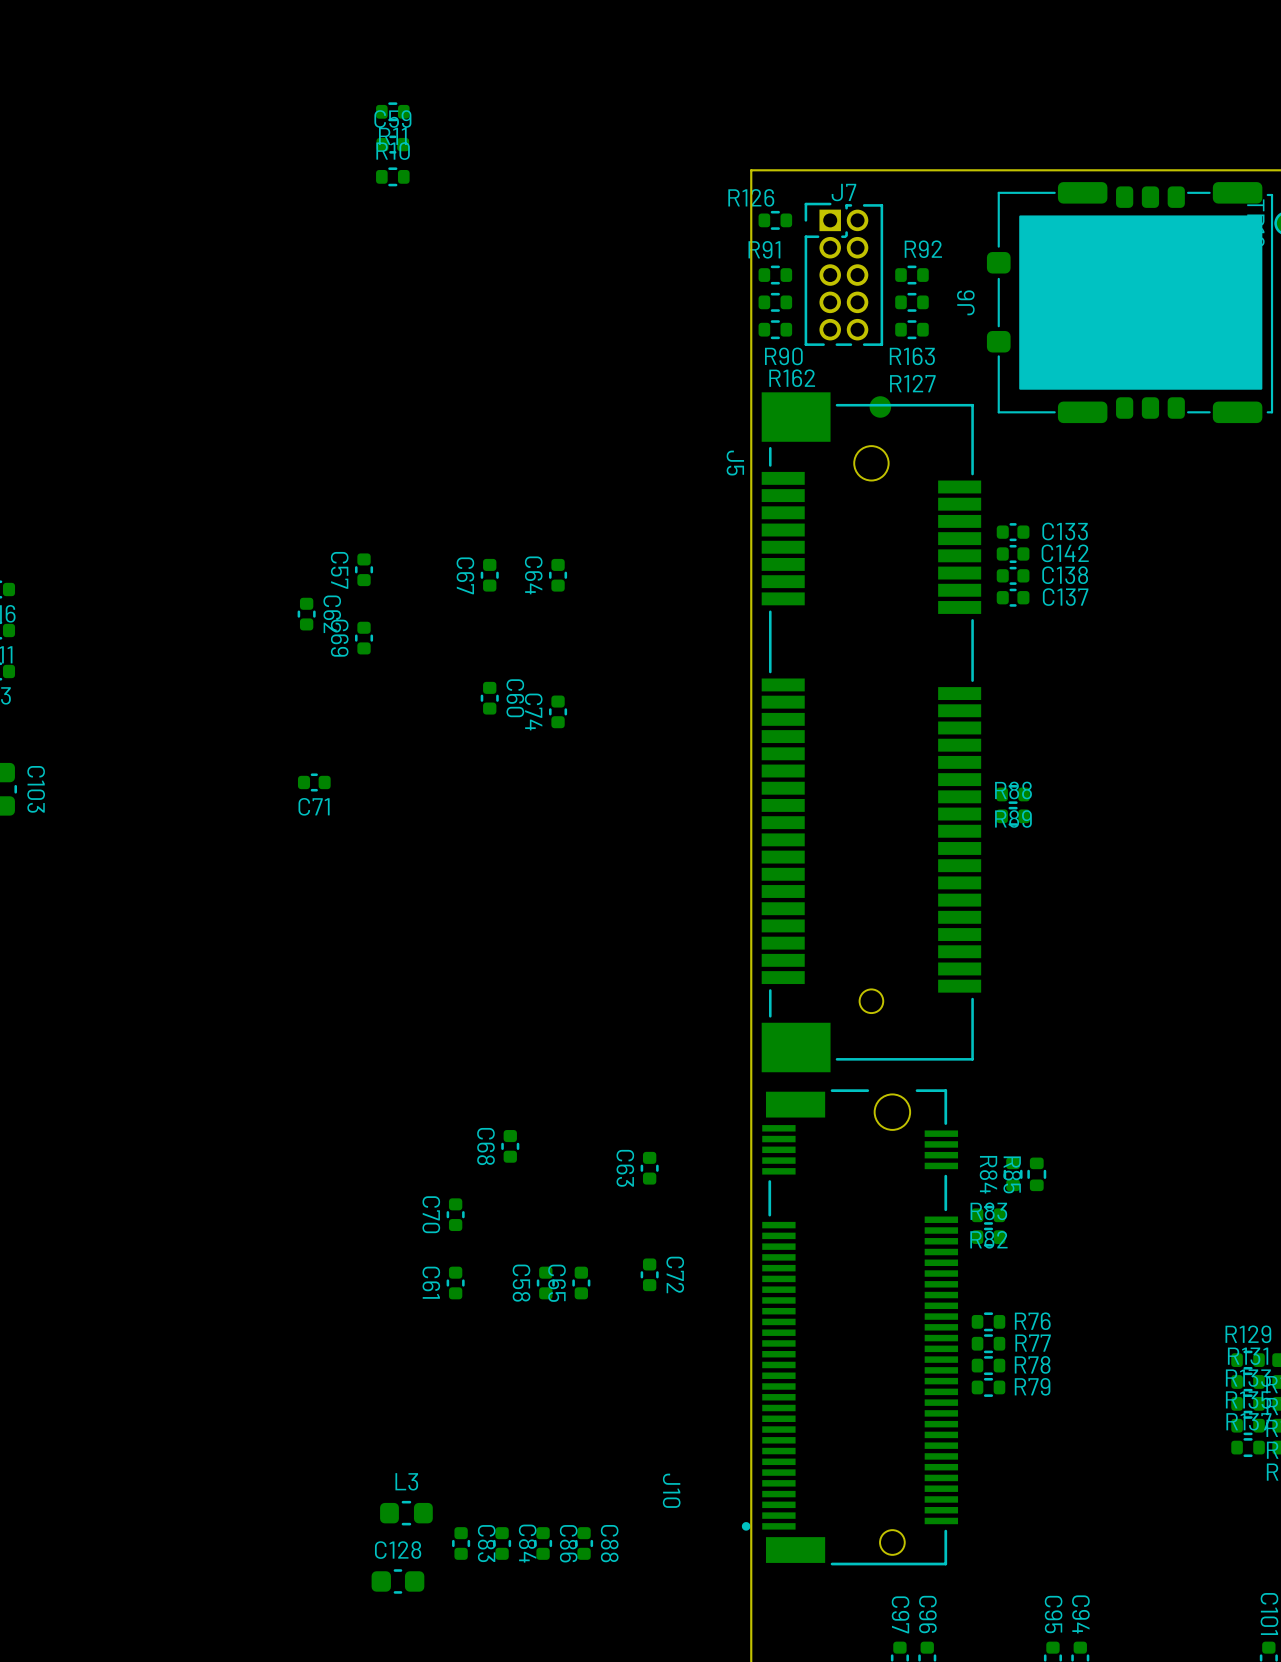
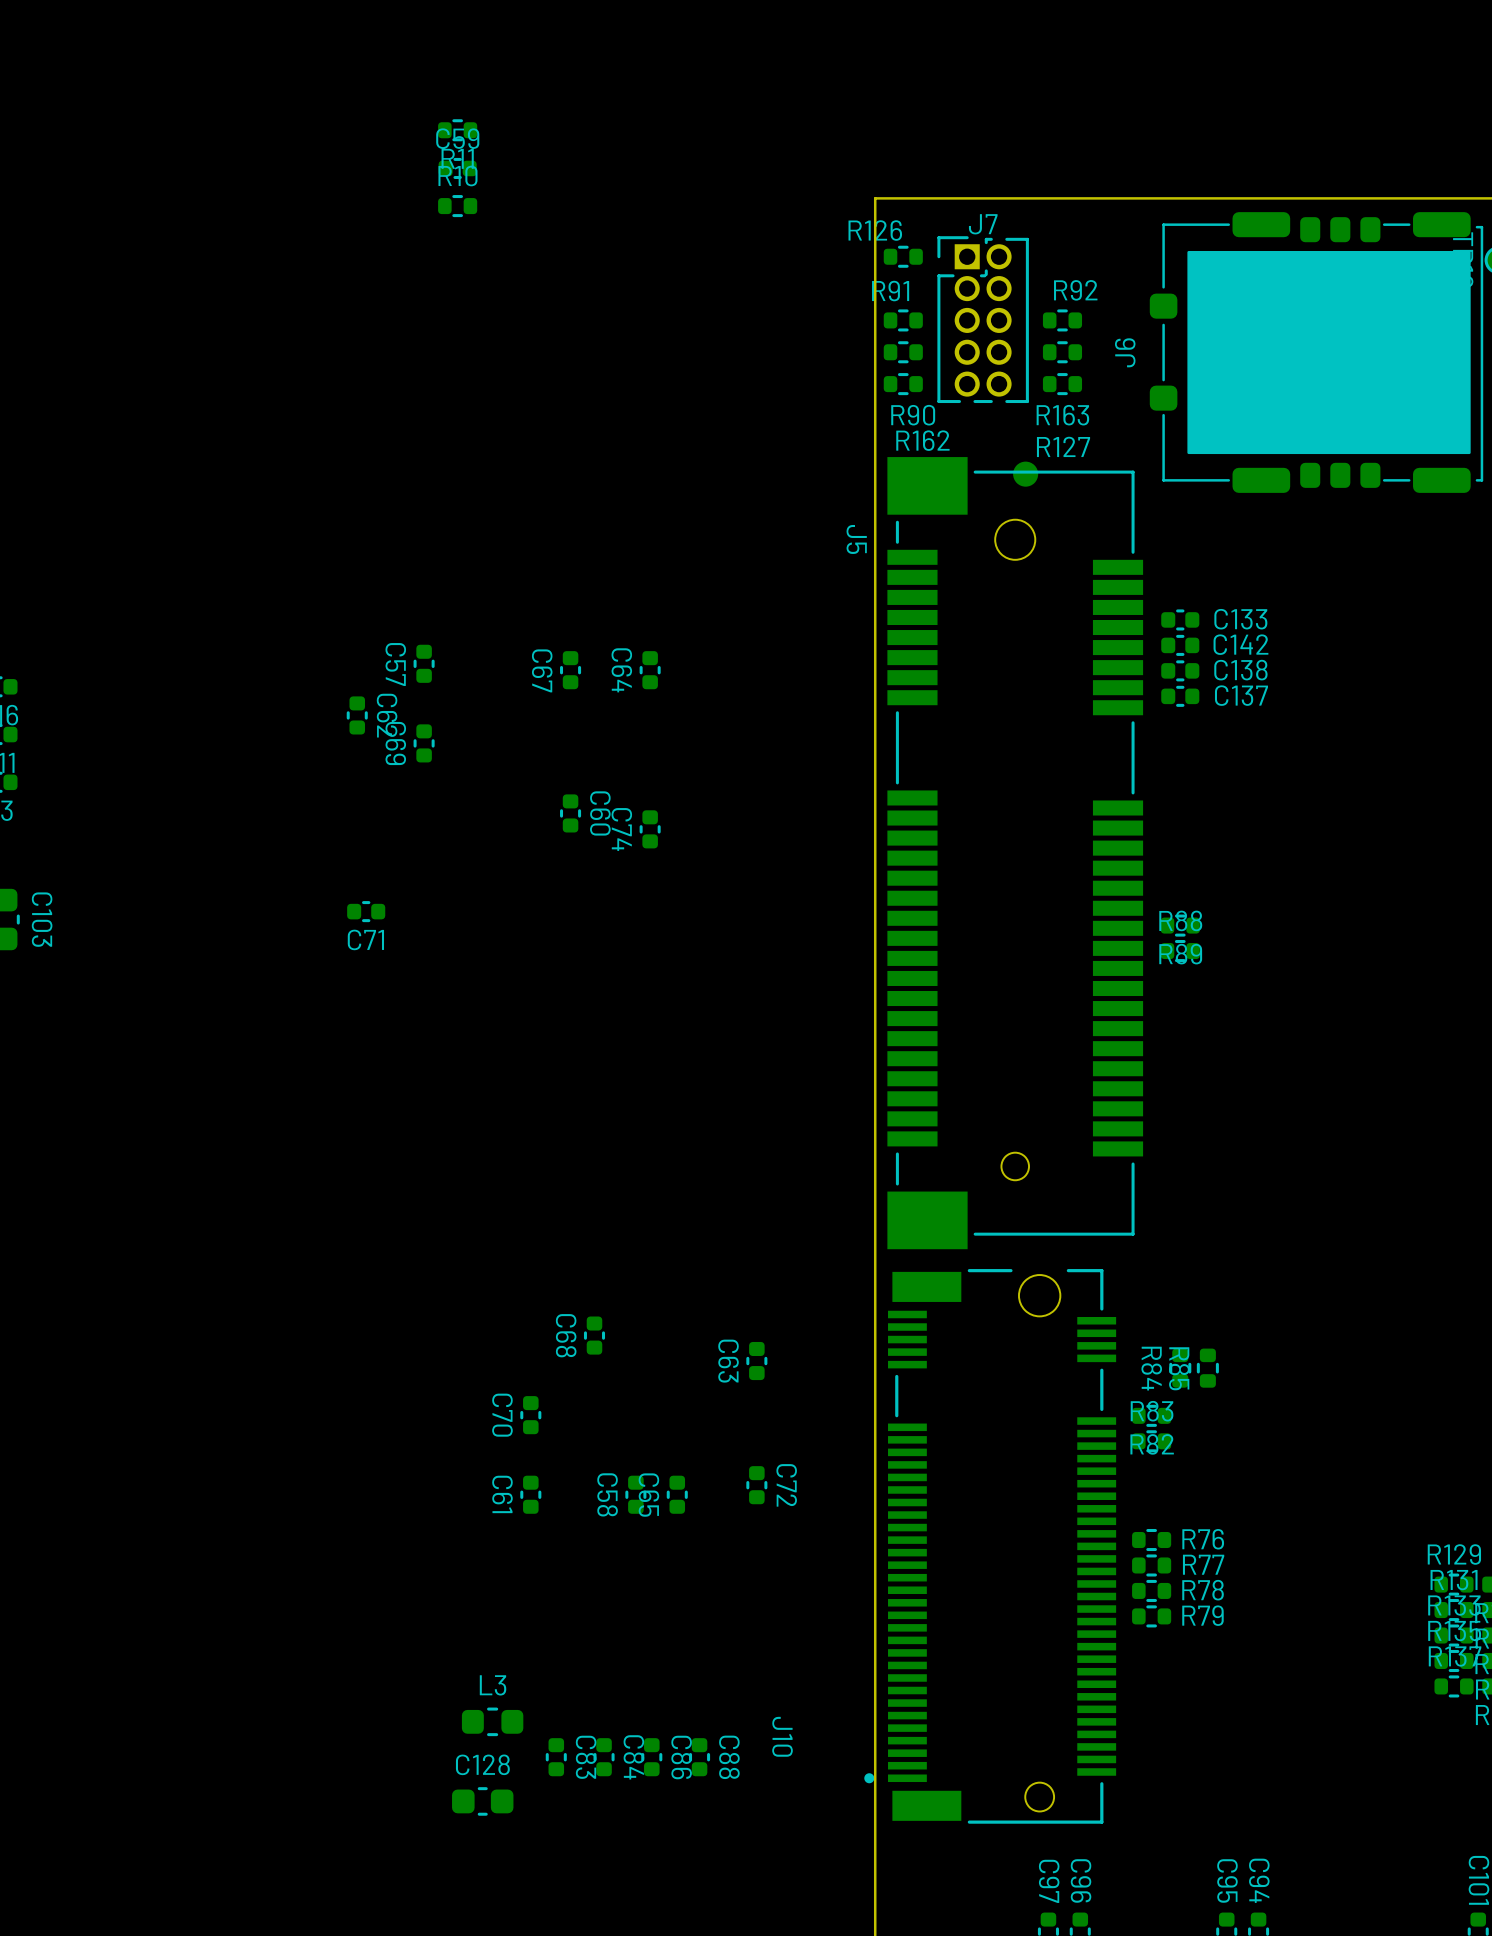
L3 position: (406, 1513) -> (492, 1721)
C83 position: (461, 1543) -> (556, 1757)
C84 position: (502, 1543) -> (604, 1757)
C86 position: (543, 1543) -> (651, 1757)
C88 position: (584, 1543) -> (699, 1757)
C128 position: (397, 1581) -> (482, 1801)

